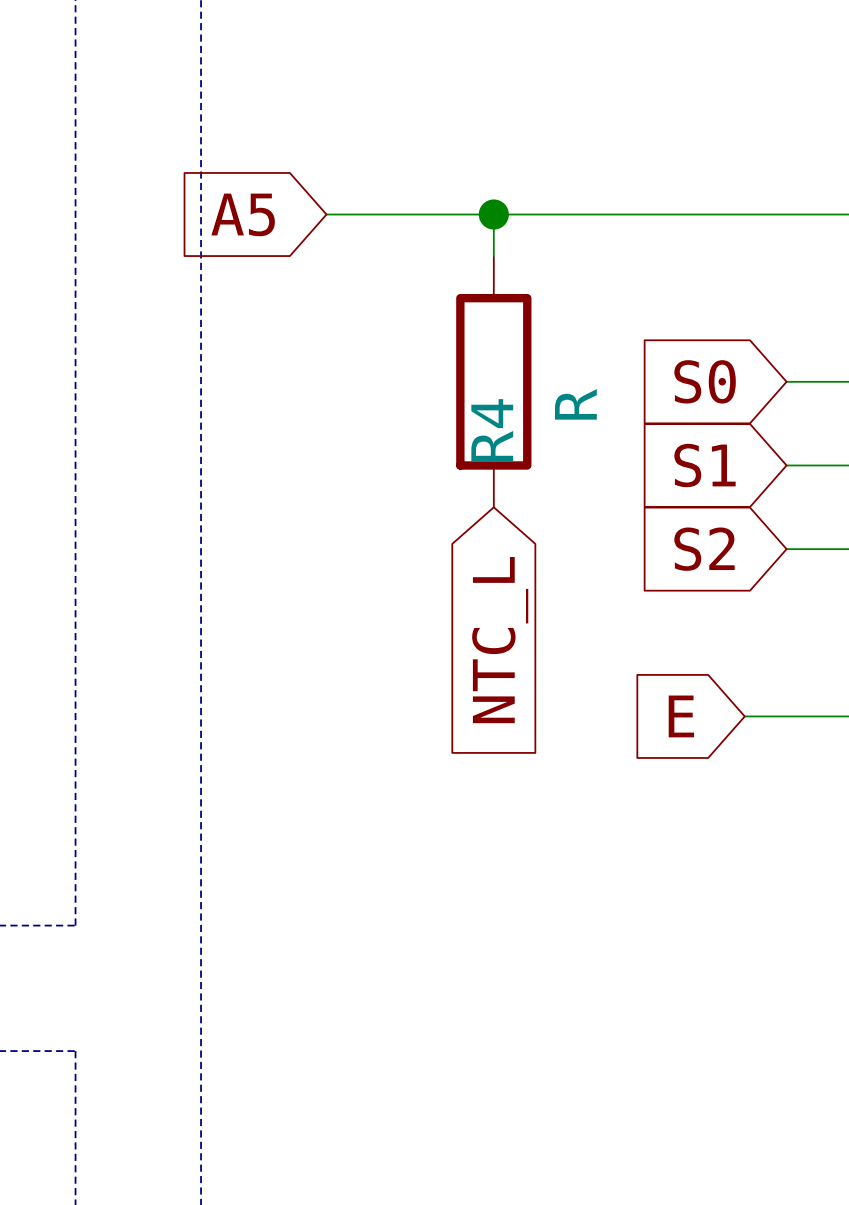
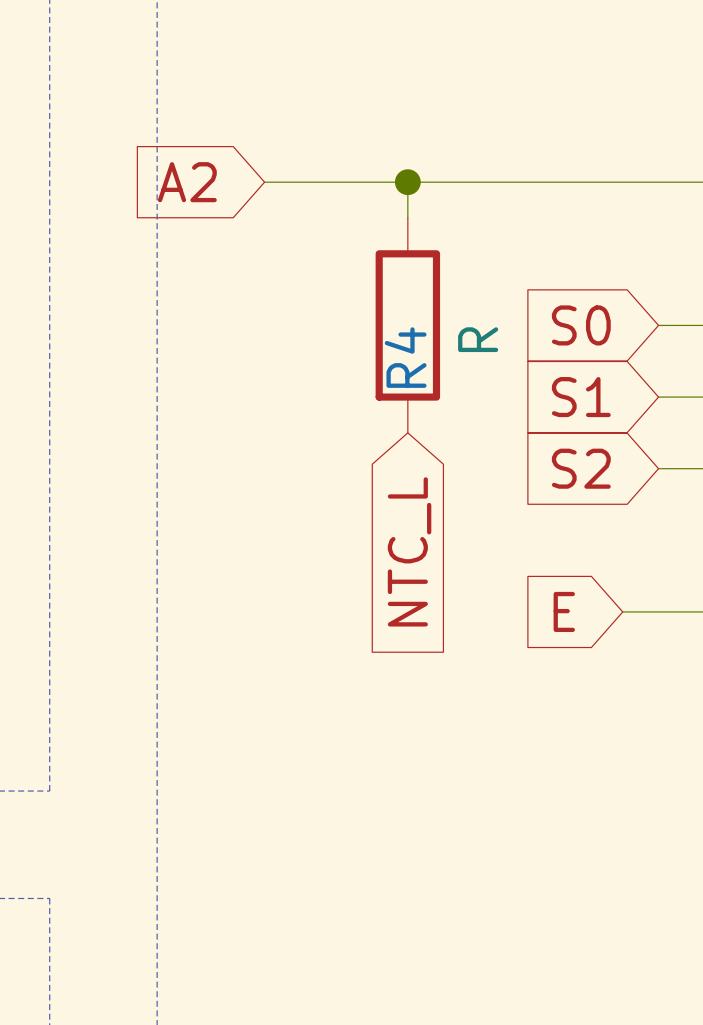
global label: A5 (243, 214) -> A2 (187, 182)

